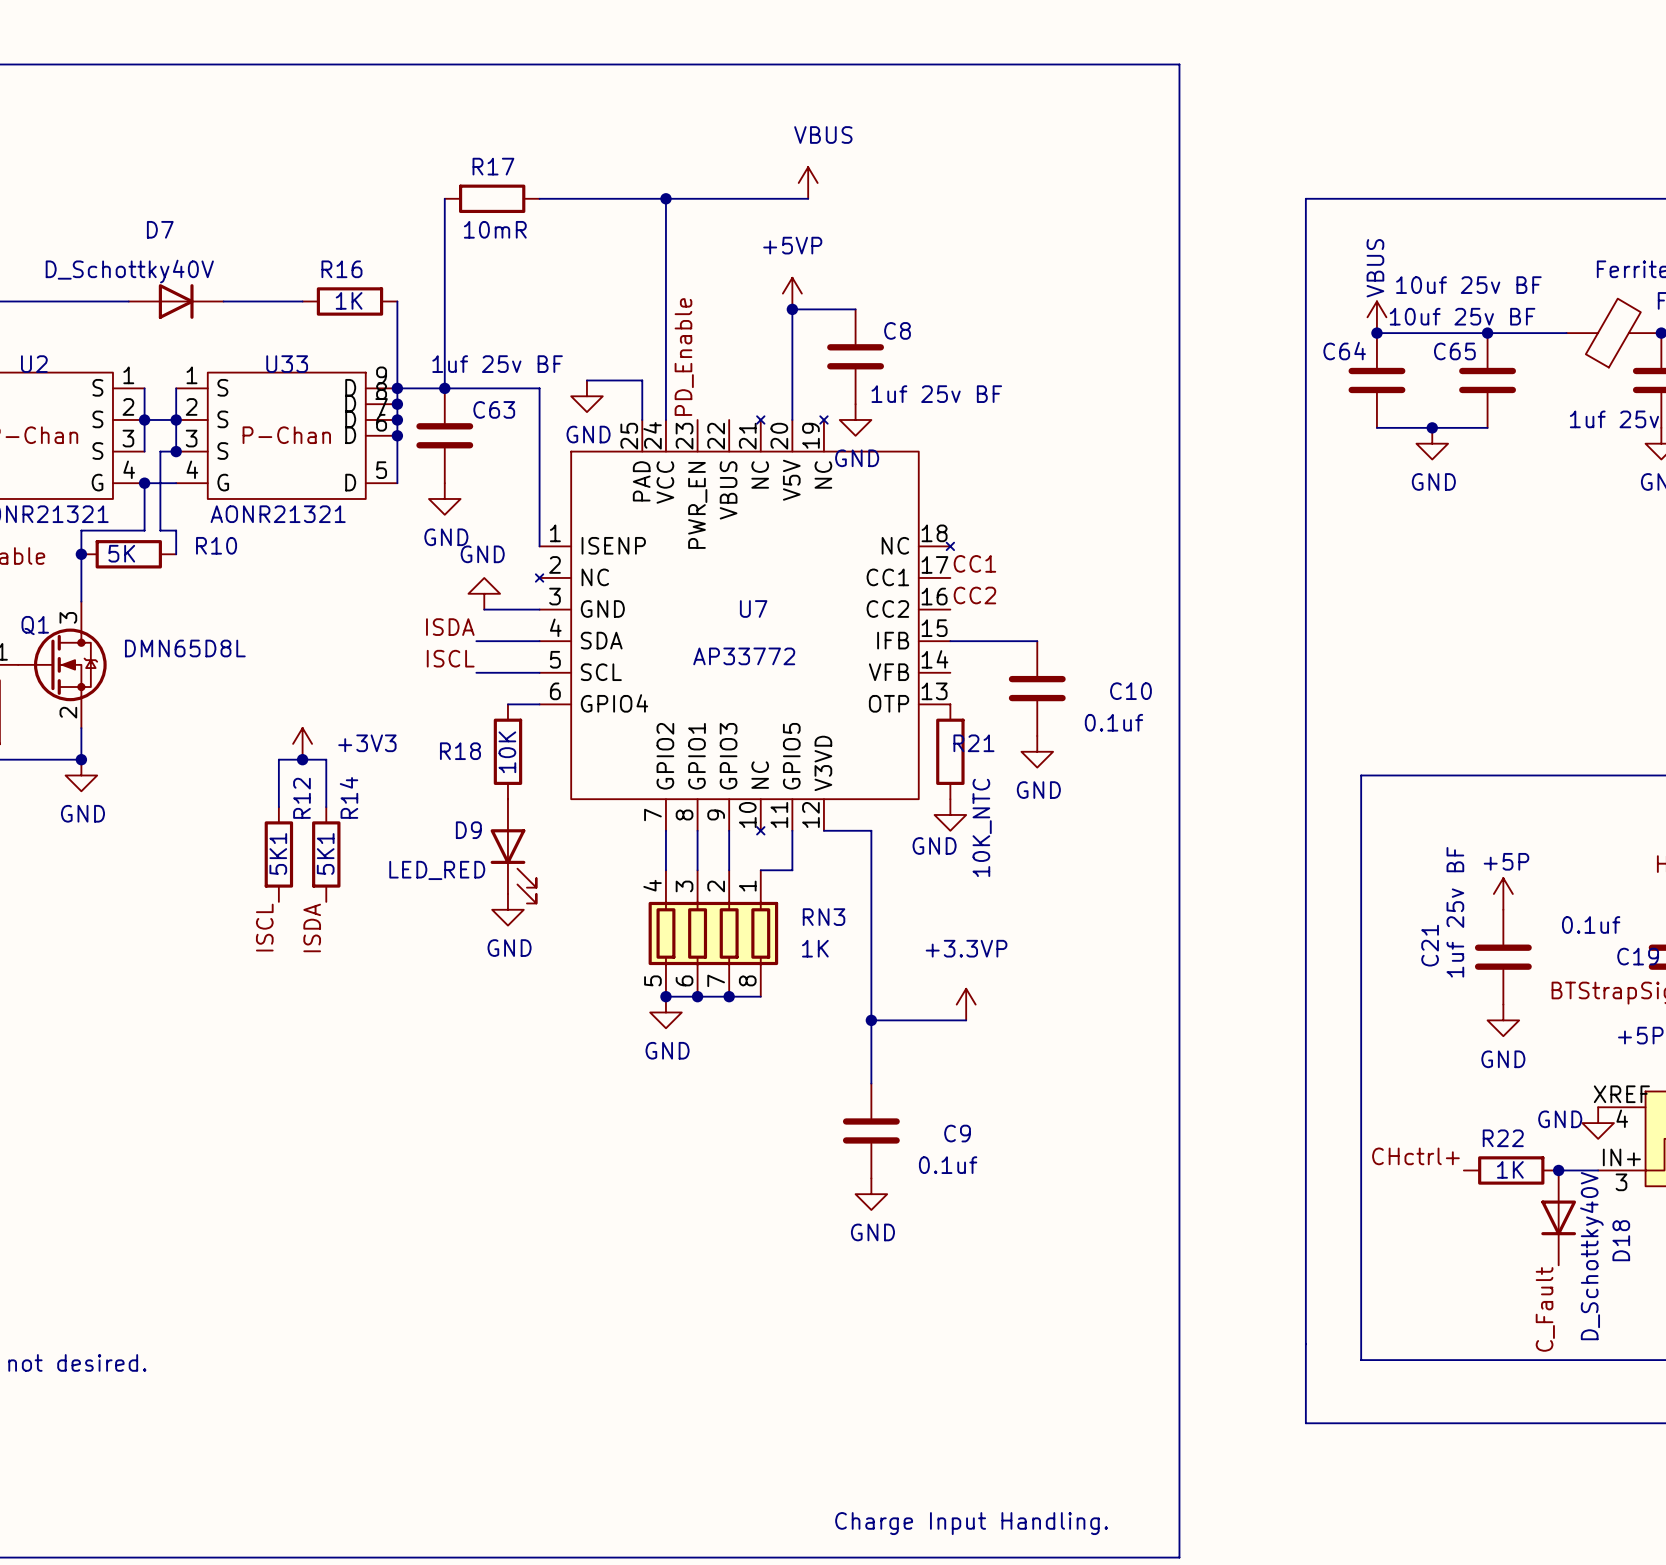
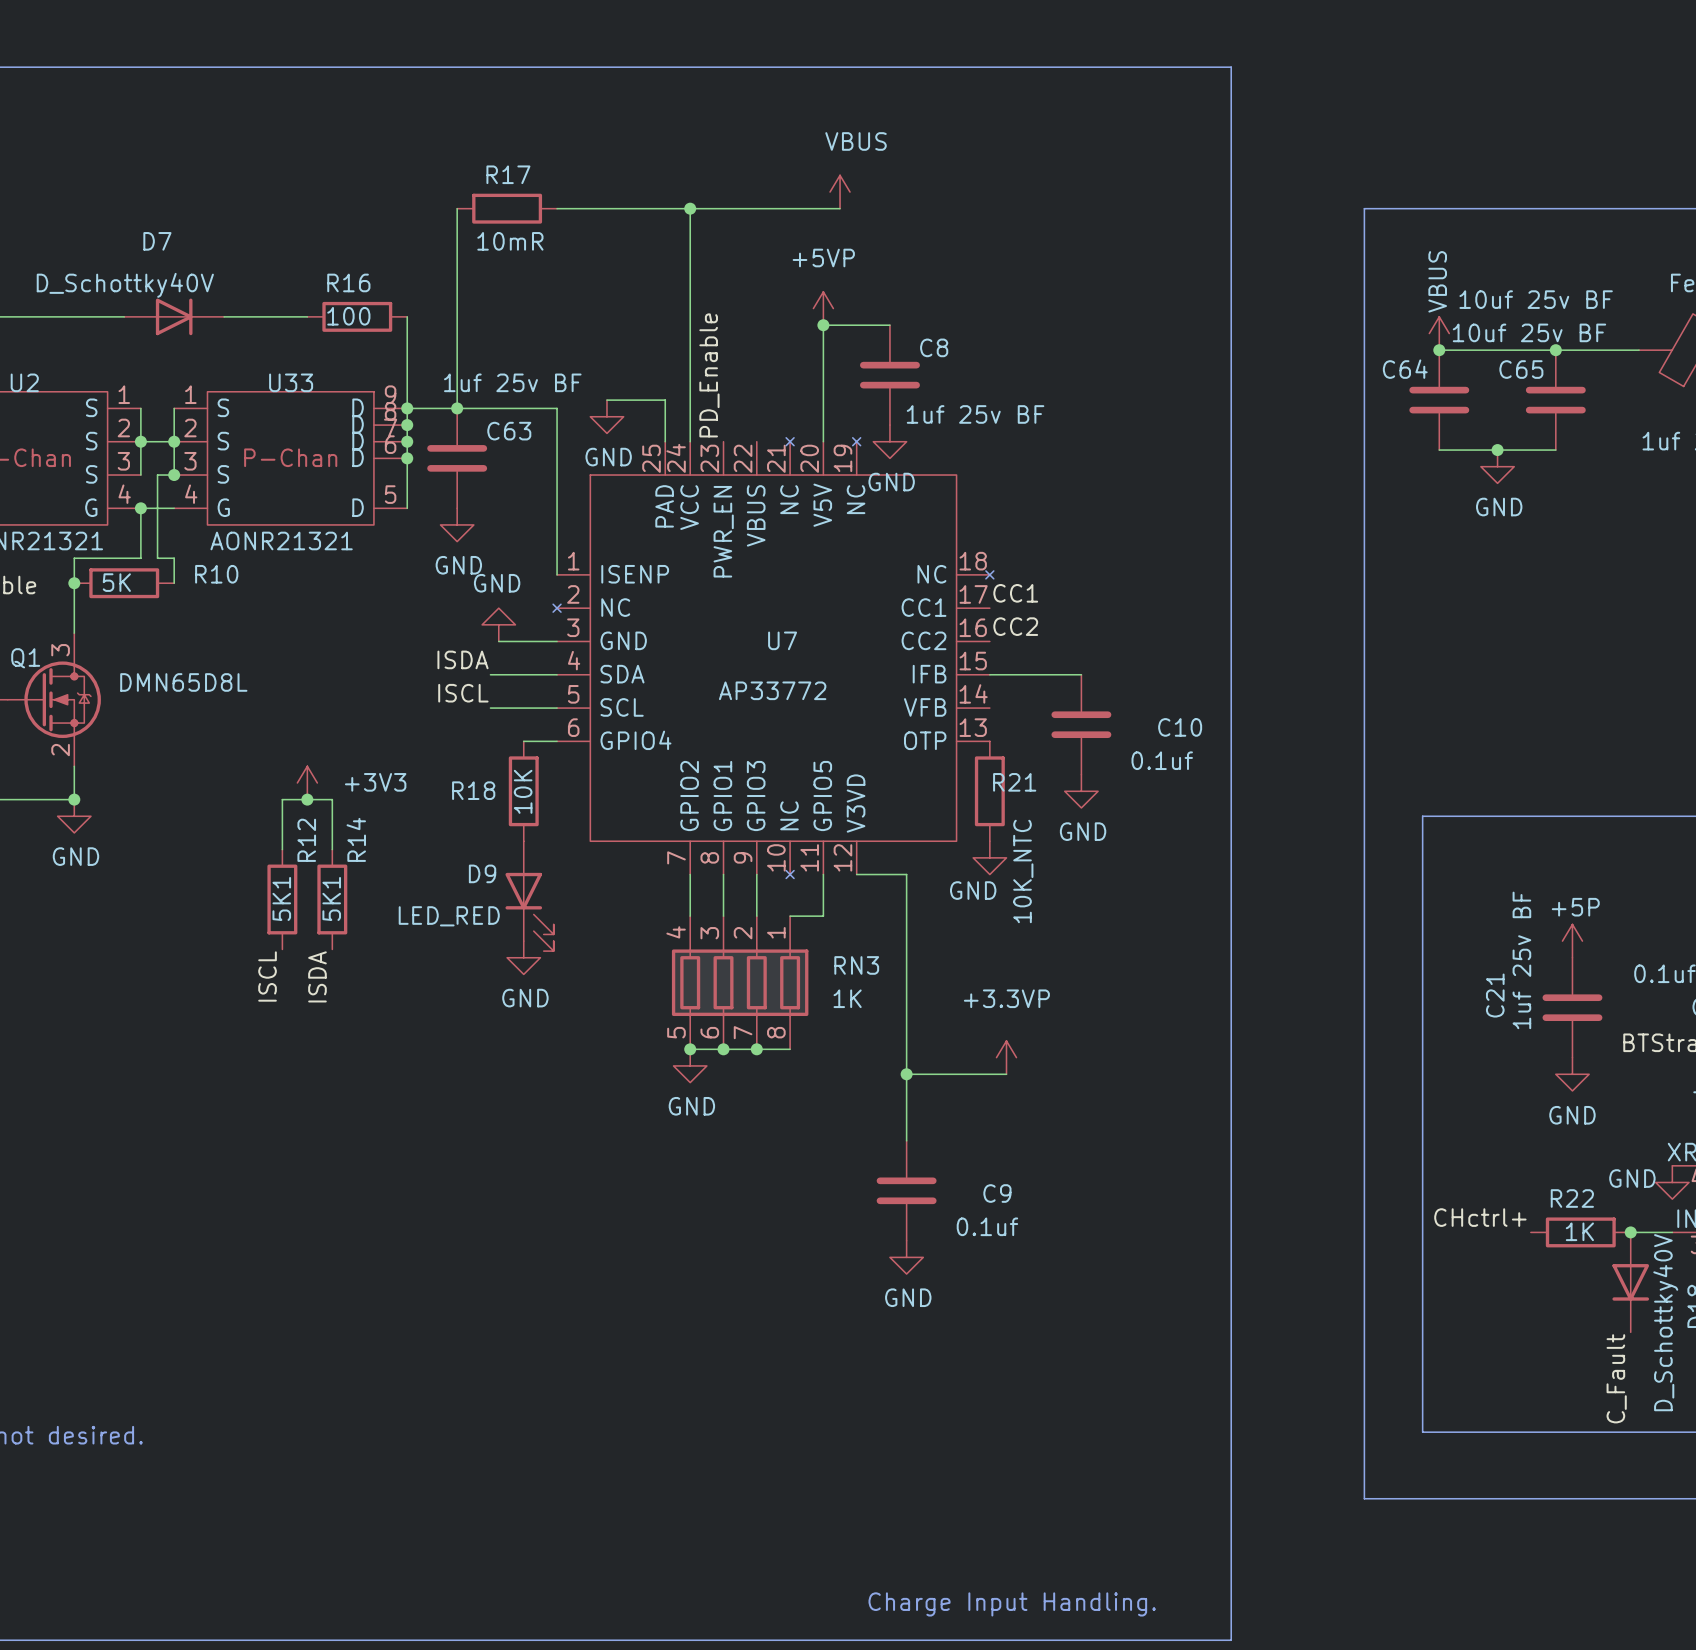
R16 value: 1K (349, 300) -> 100 (348, 316)

